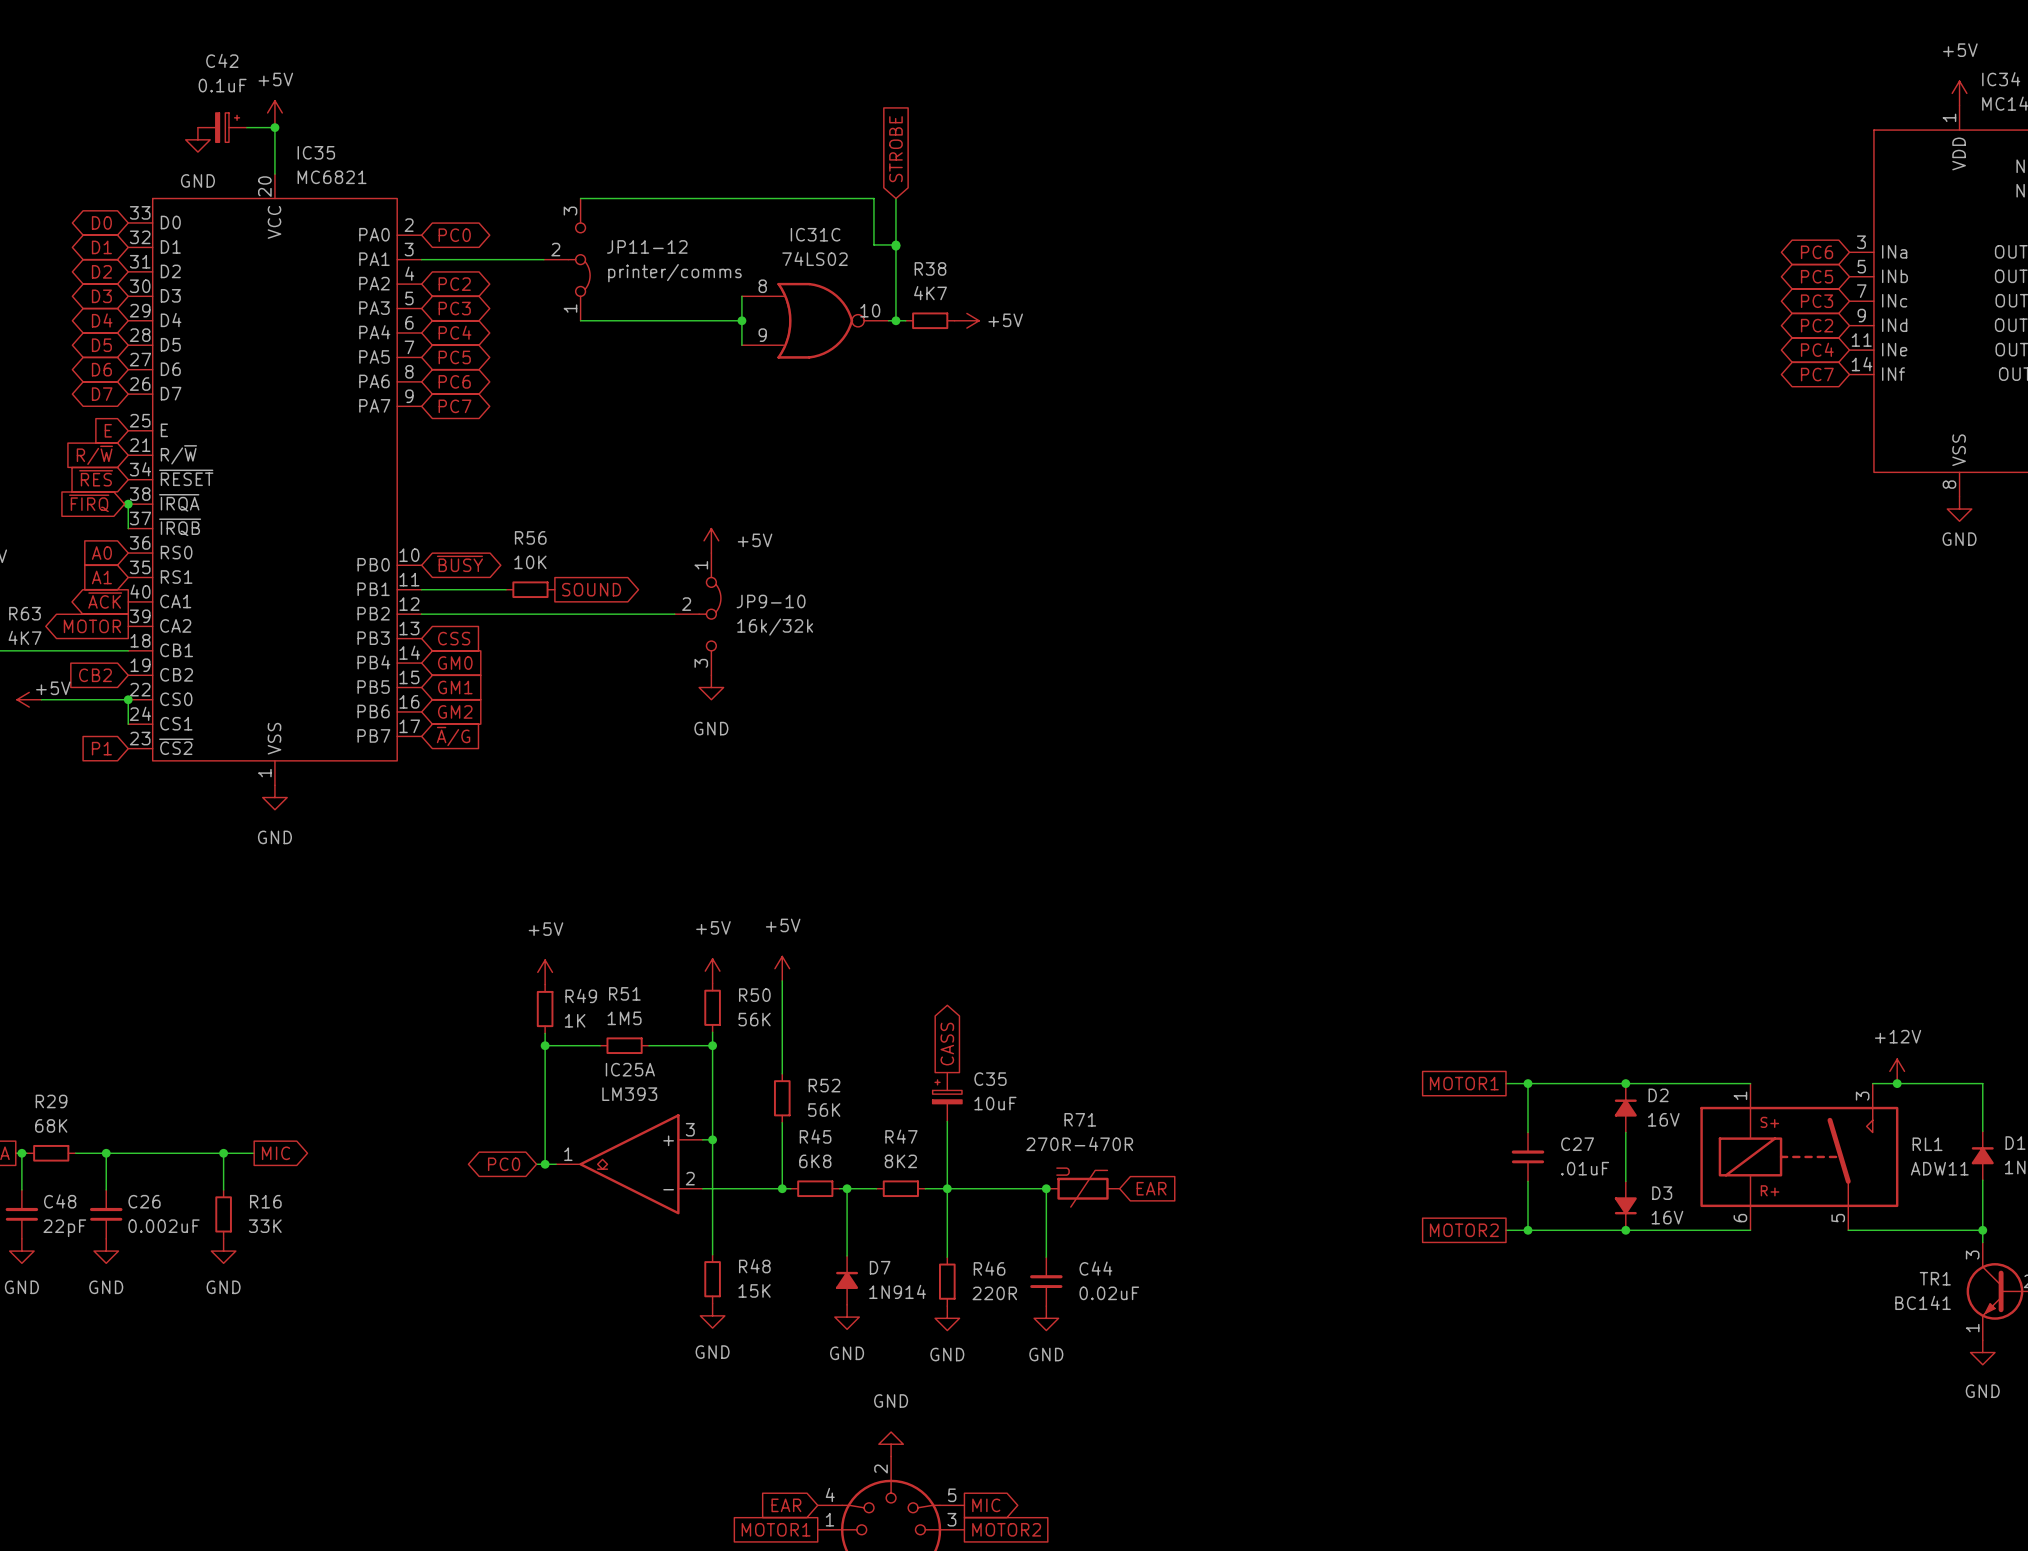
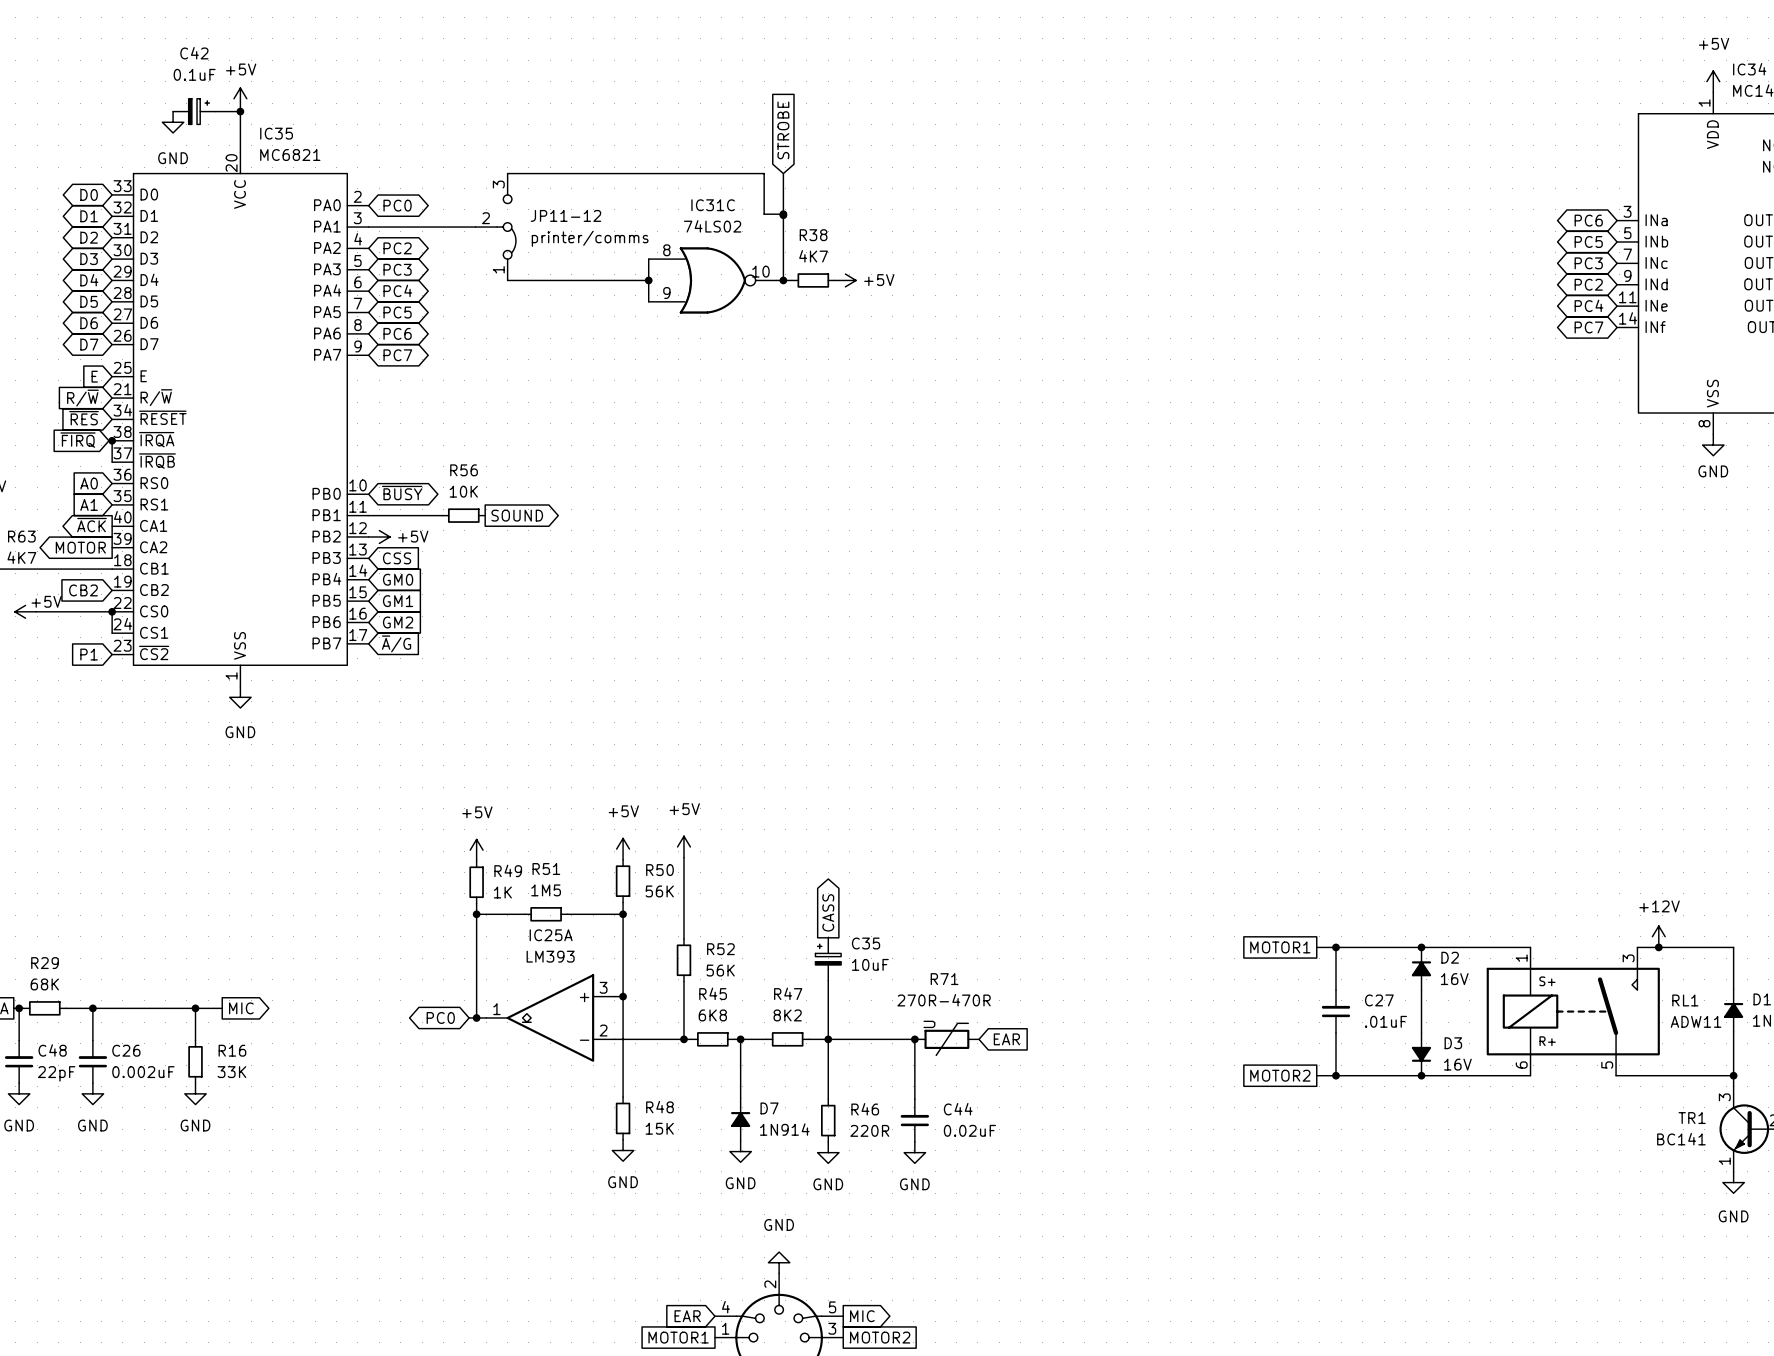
power symbol: +5V (711, 540) -> none
wire: (421, 614) (674, 614) -> none
power symbol: none -> +5V (379, 536)
JP9-10: 16k/32k (697, 614) -> none
power symbol: GND (711, 687) -> none

